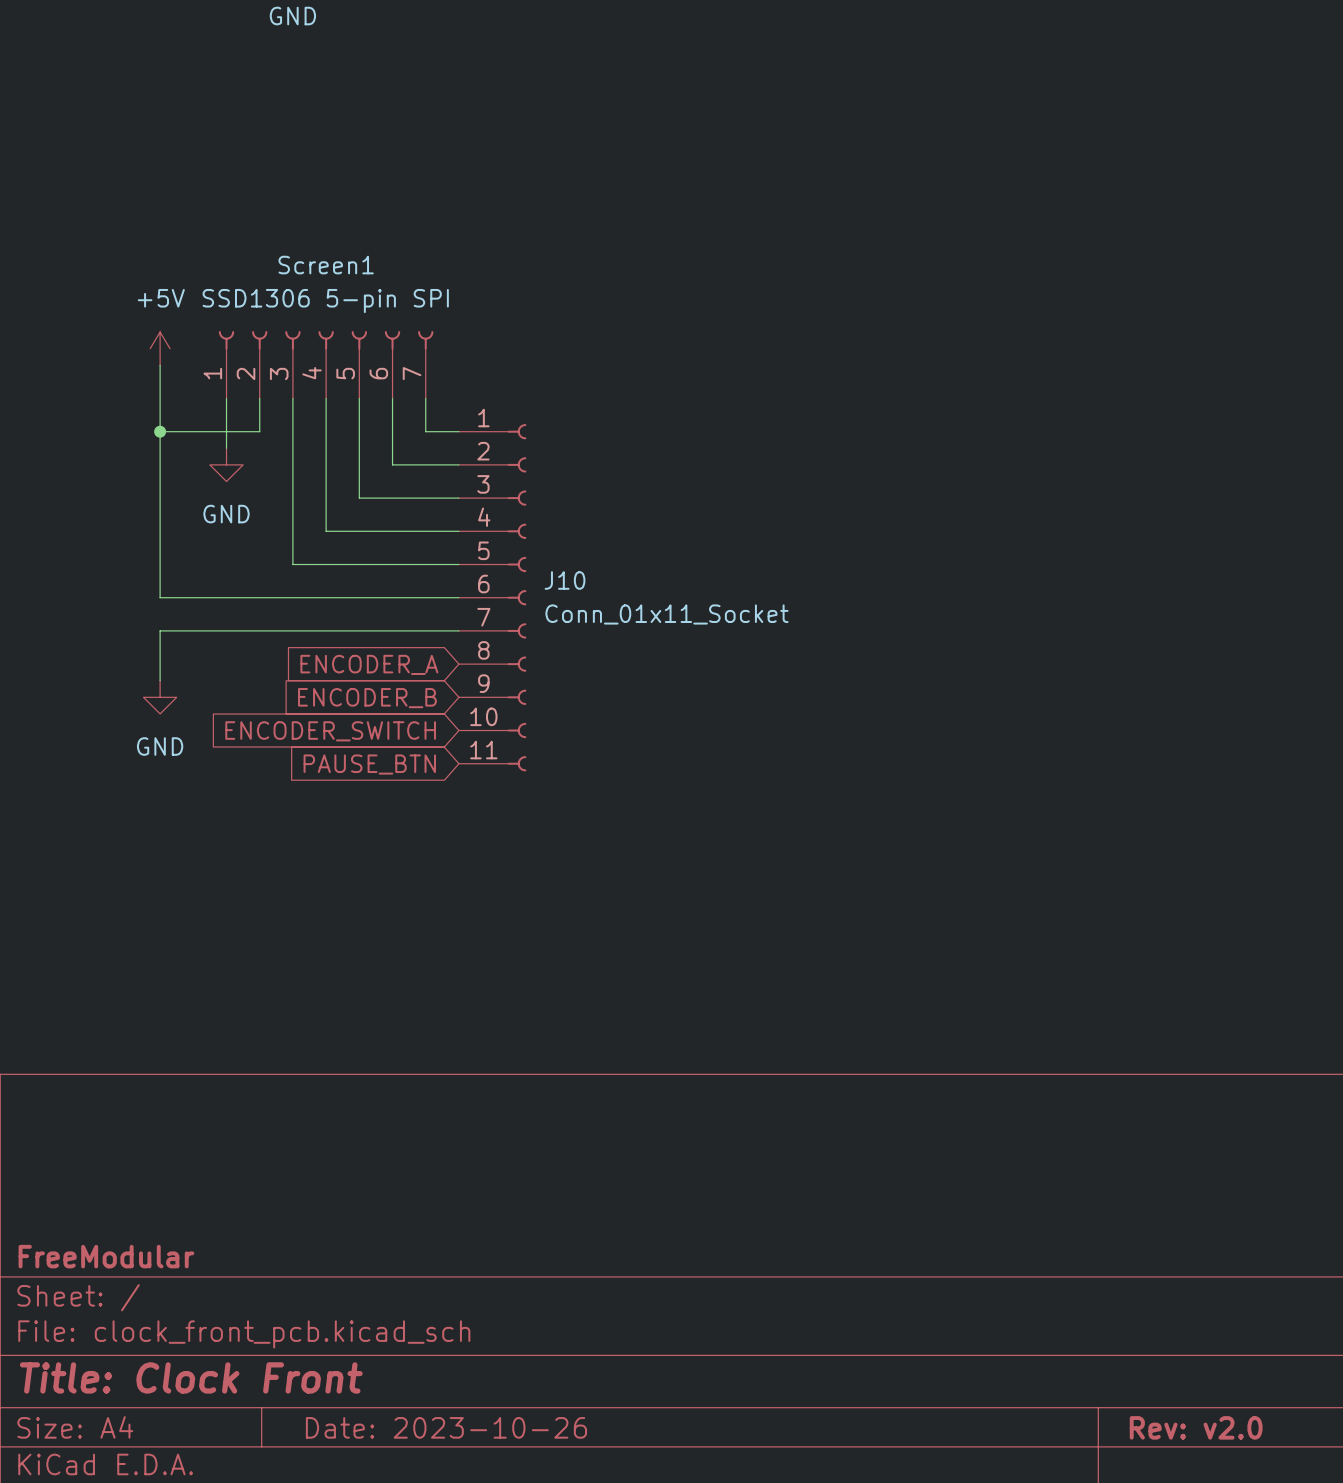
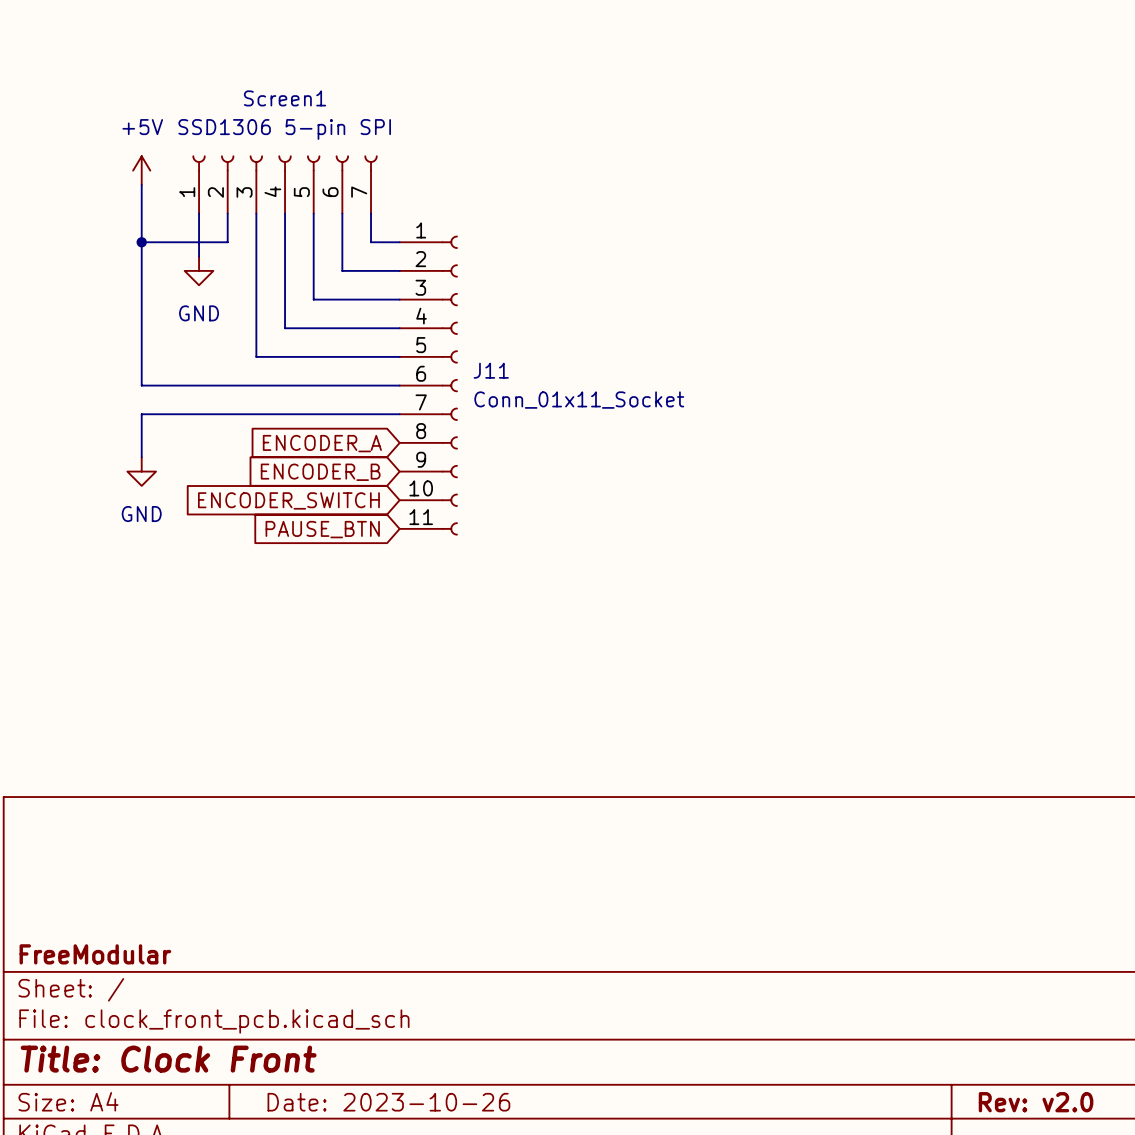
J10 name: J10 (565, 580) -> J11 (491, 370)

